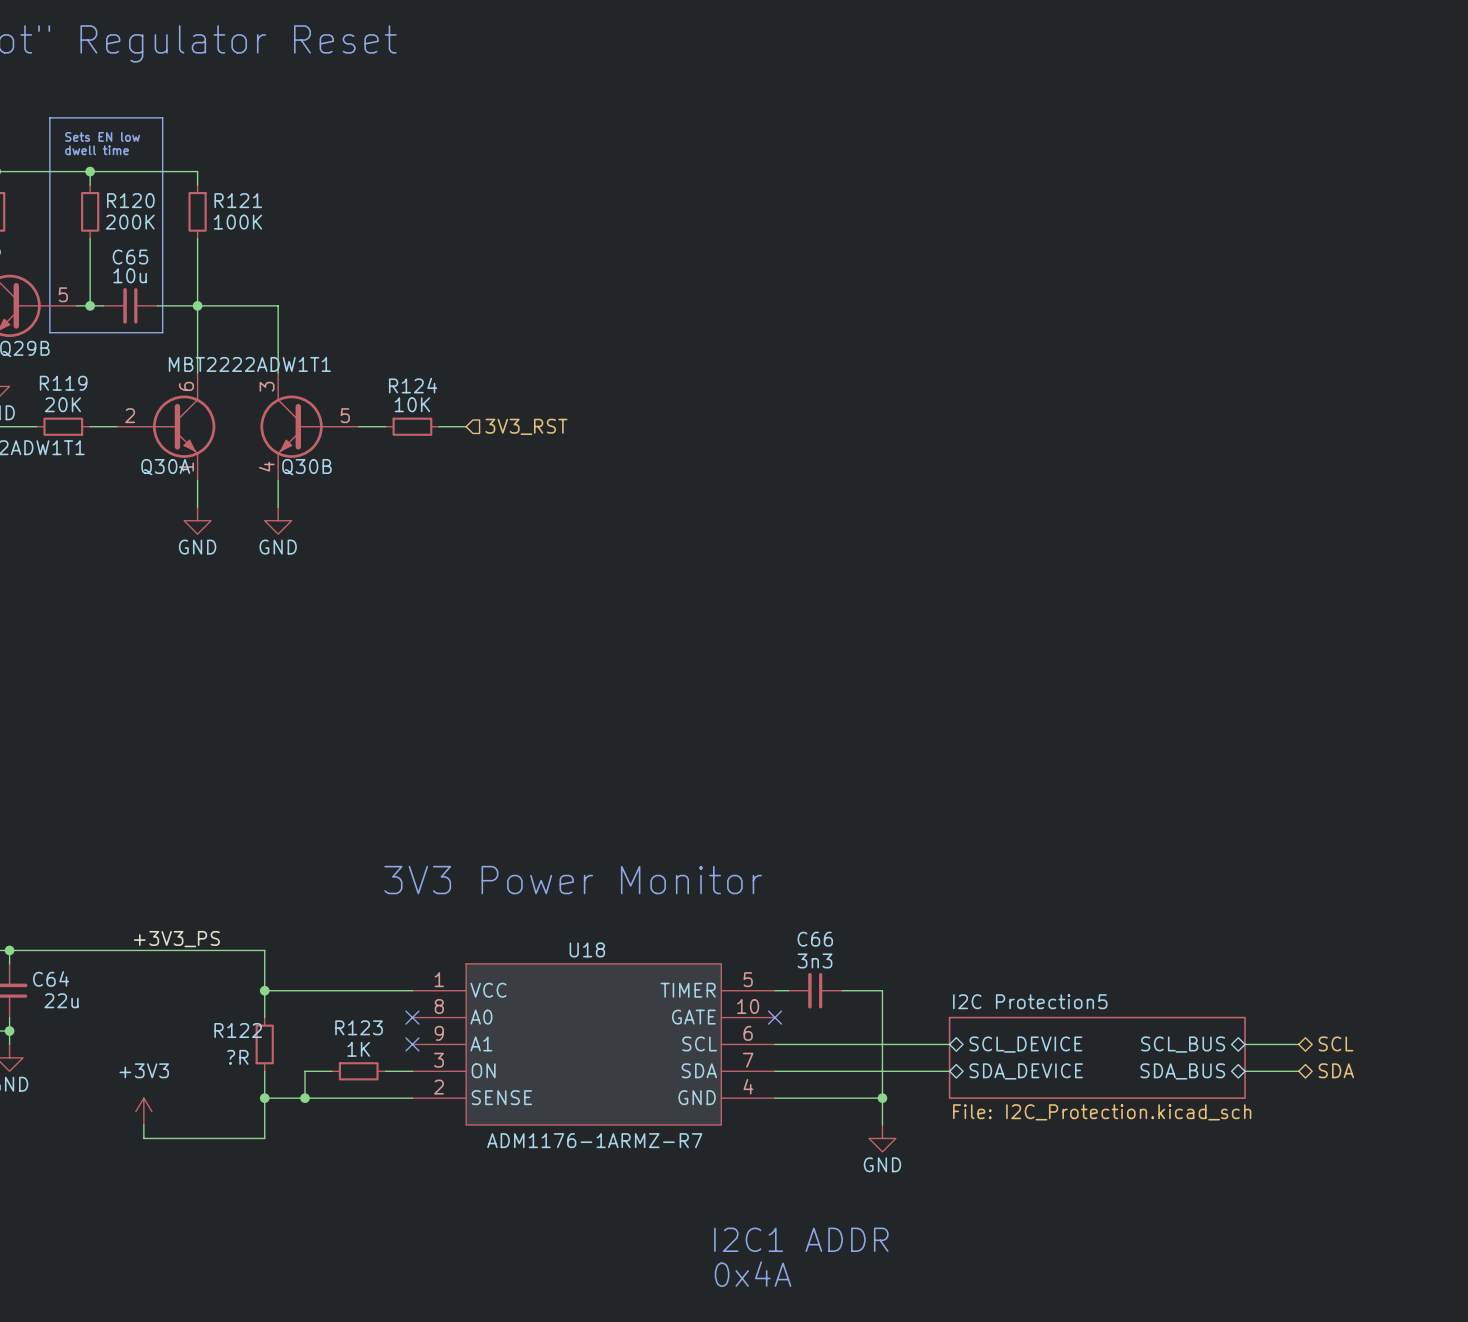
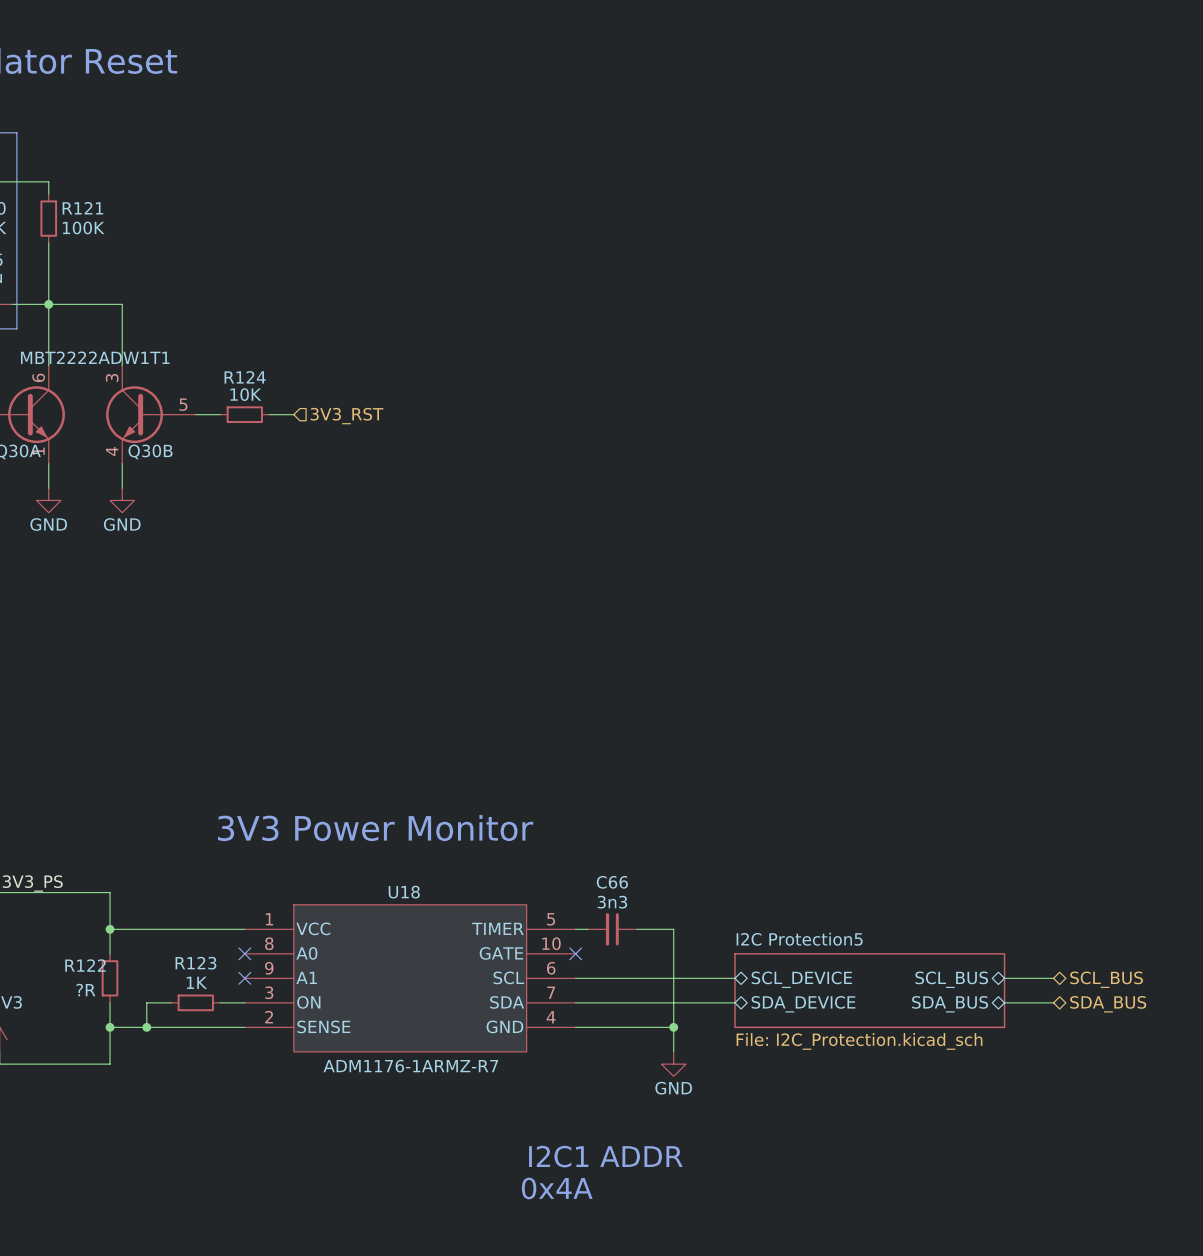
hierarchical label: SCL (1336, 1043) -> SCL_BUS (1106, 979)
hierarchical label: SDA (1336, 1070) -> SDA_BUS (1108, 1004)

